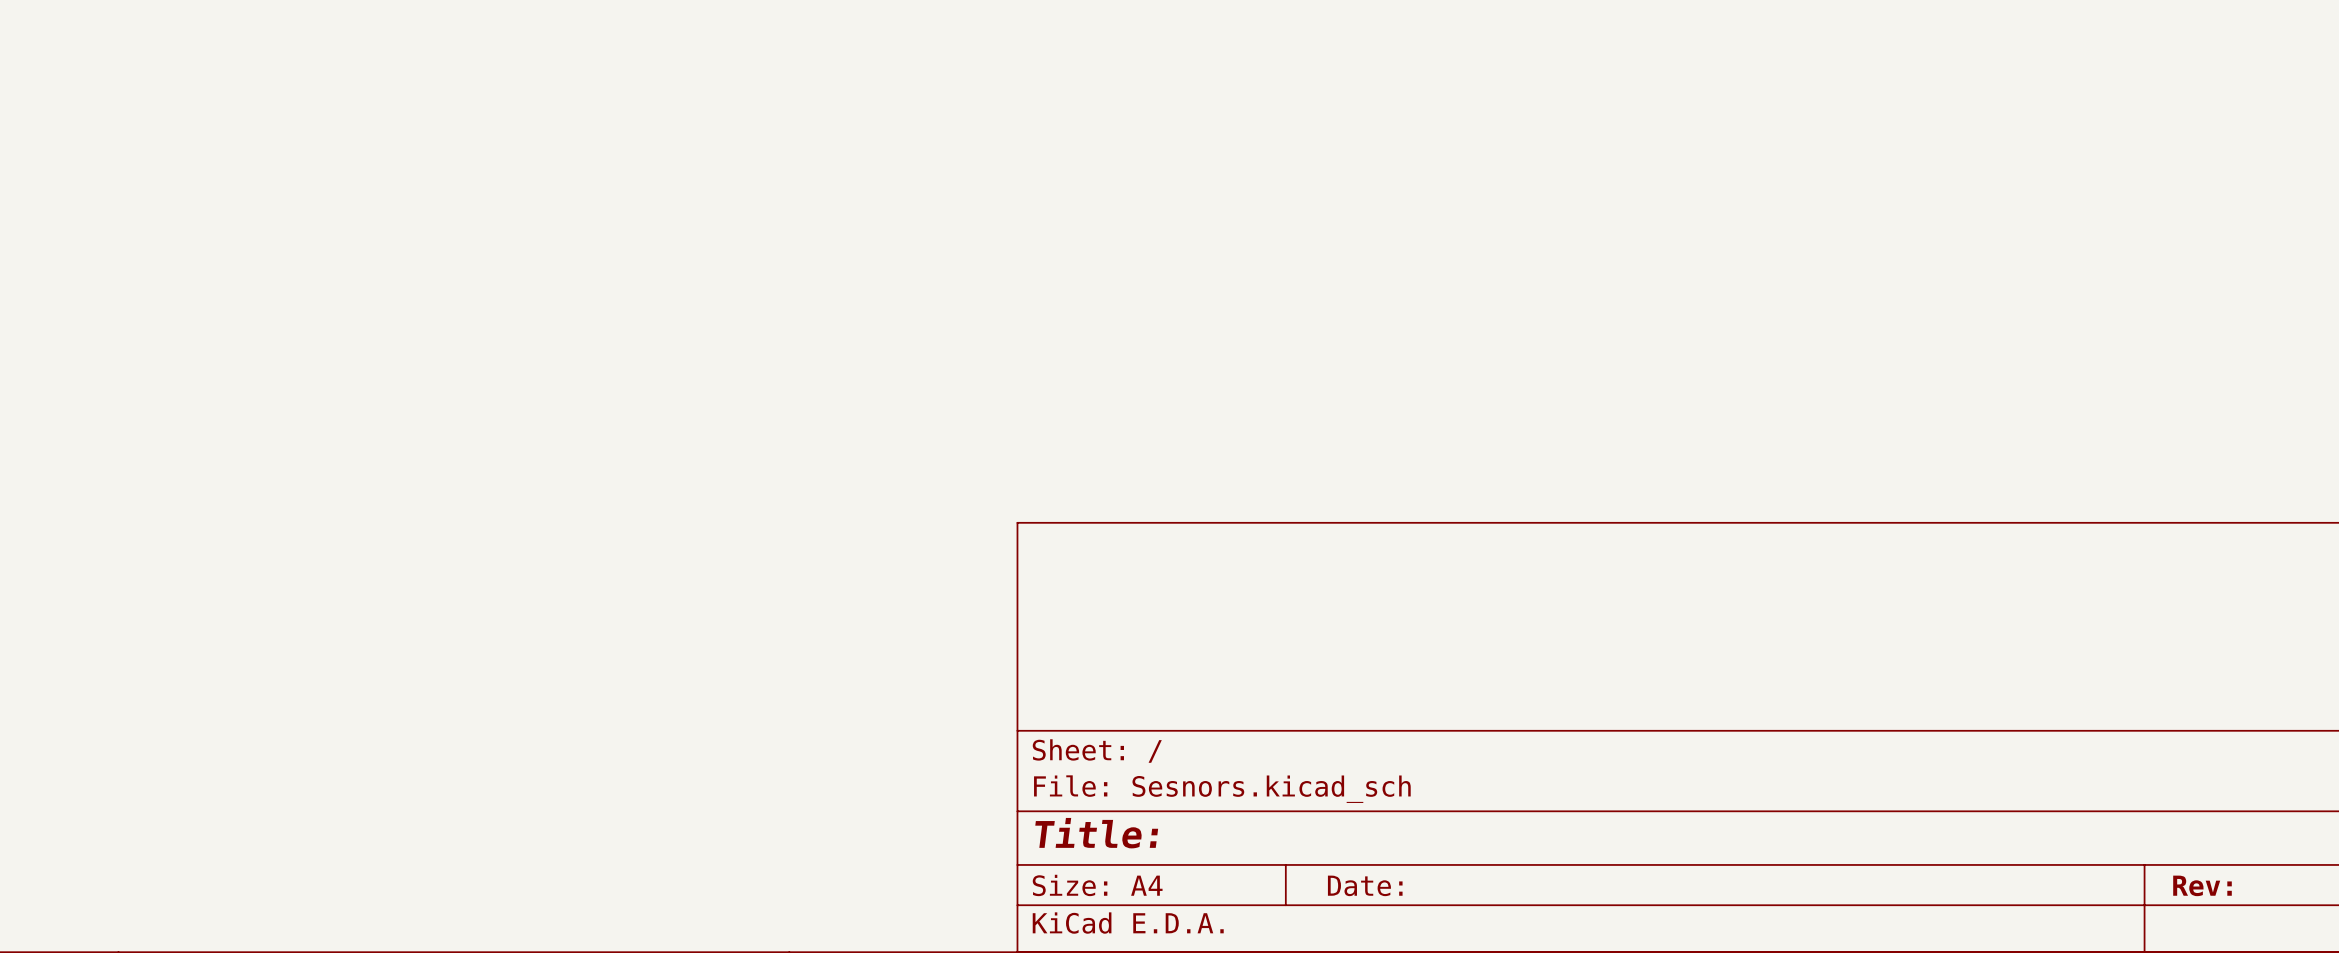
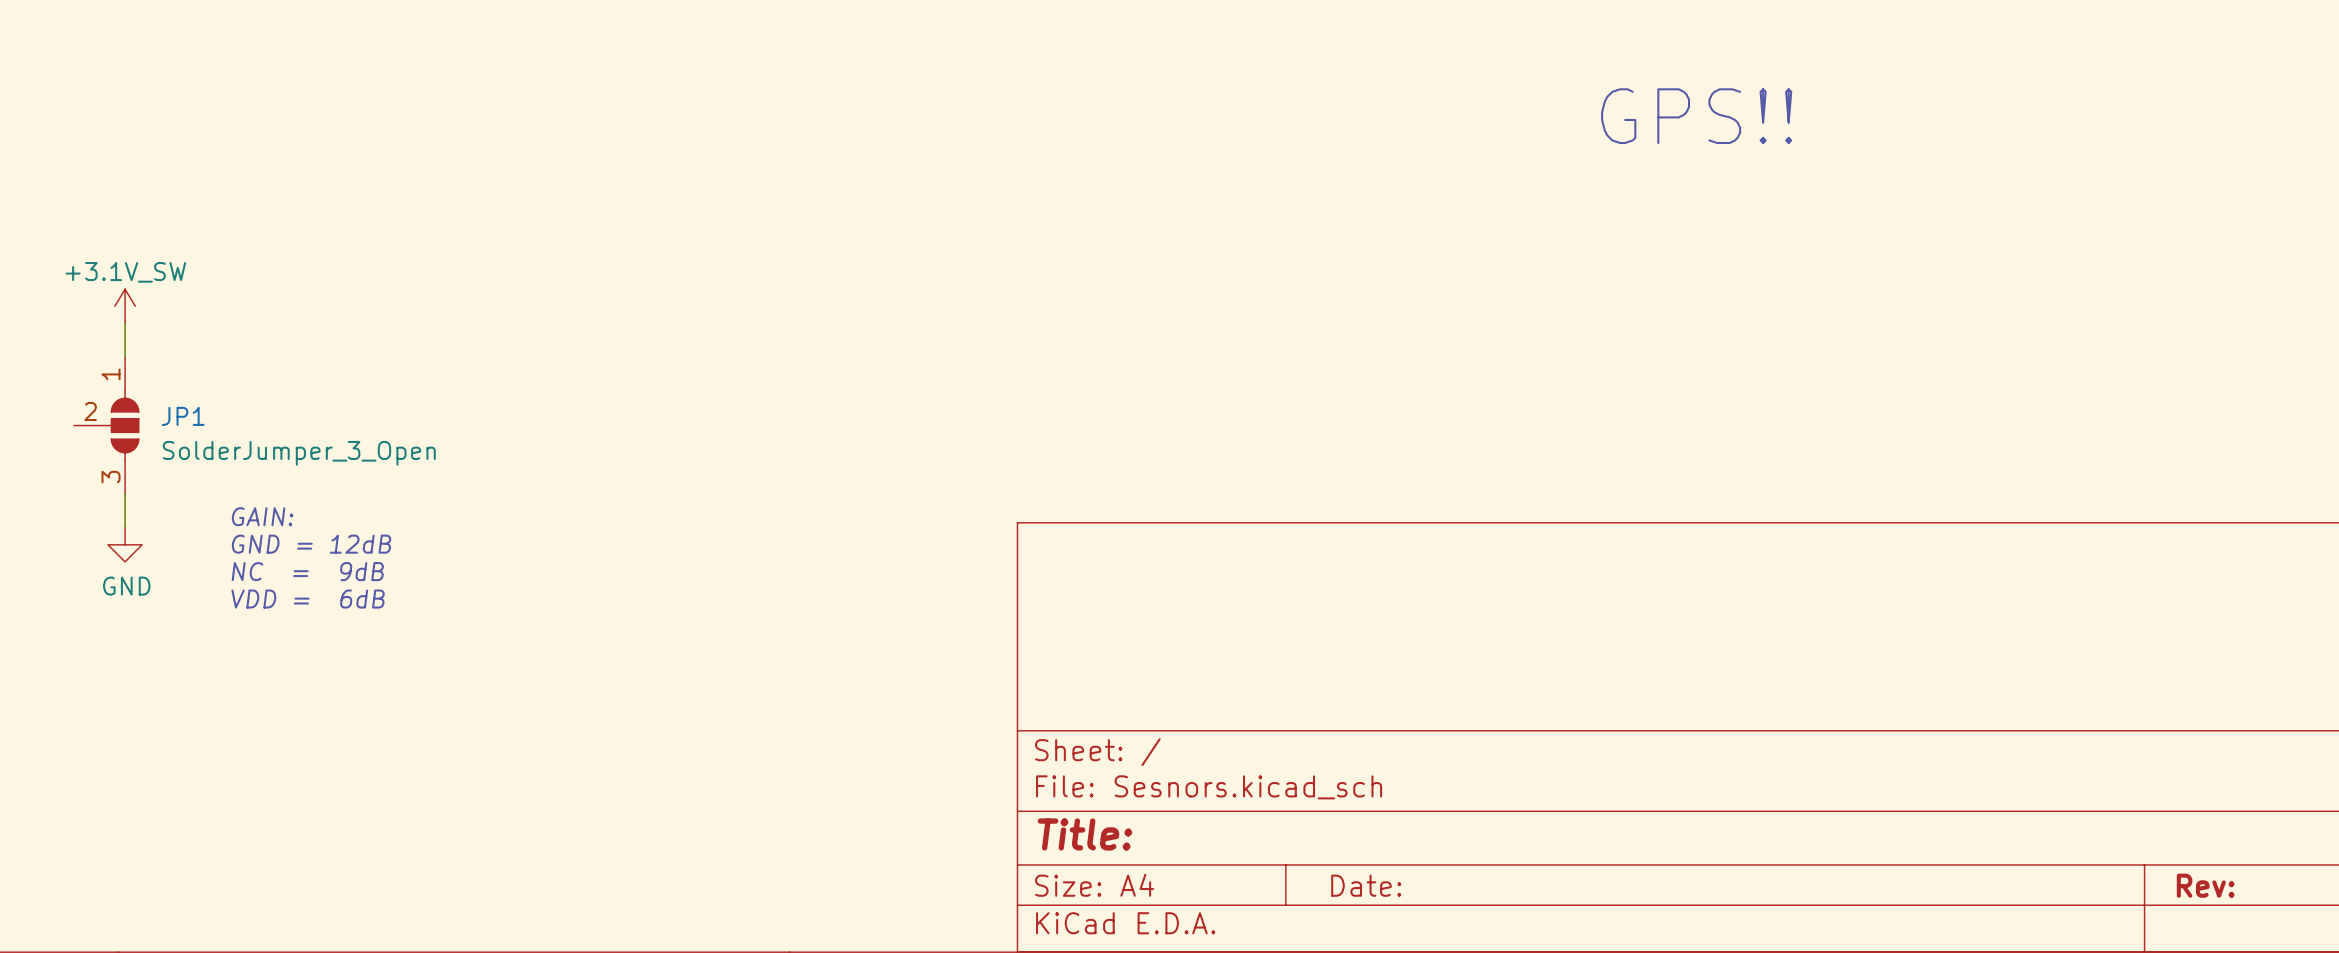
text: none -> GPS!! (1696, 116)
power symbol: none -> +3.1V_SW (125, 306)
wire: none -> (125, 323) (125, 357)
JP1: none -> SolderJumper_3_Open (106, 425)
wire: none -> (125, 493) (125, 527)
text: none -> GAIN: (262, 516)
text: none -> GND = 12dB (311, 544)
power symbol: none -> GND (125, 544)
text: none -> NC = 9dB (307, 571)
text: none -> VDD = 6dB (308, 599)

